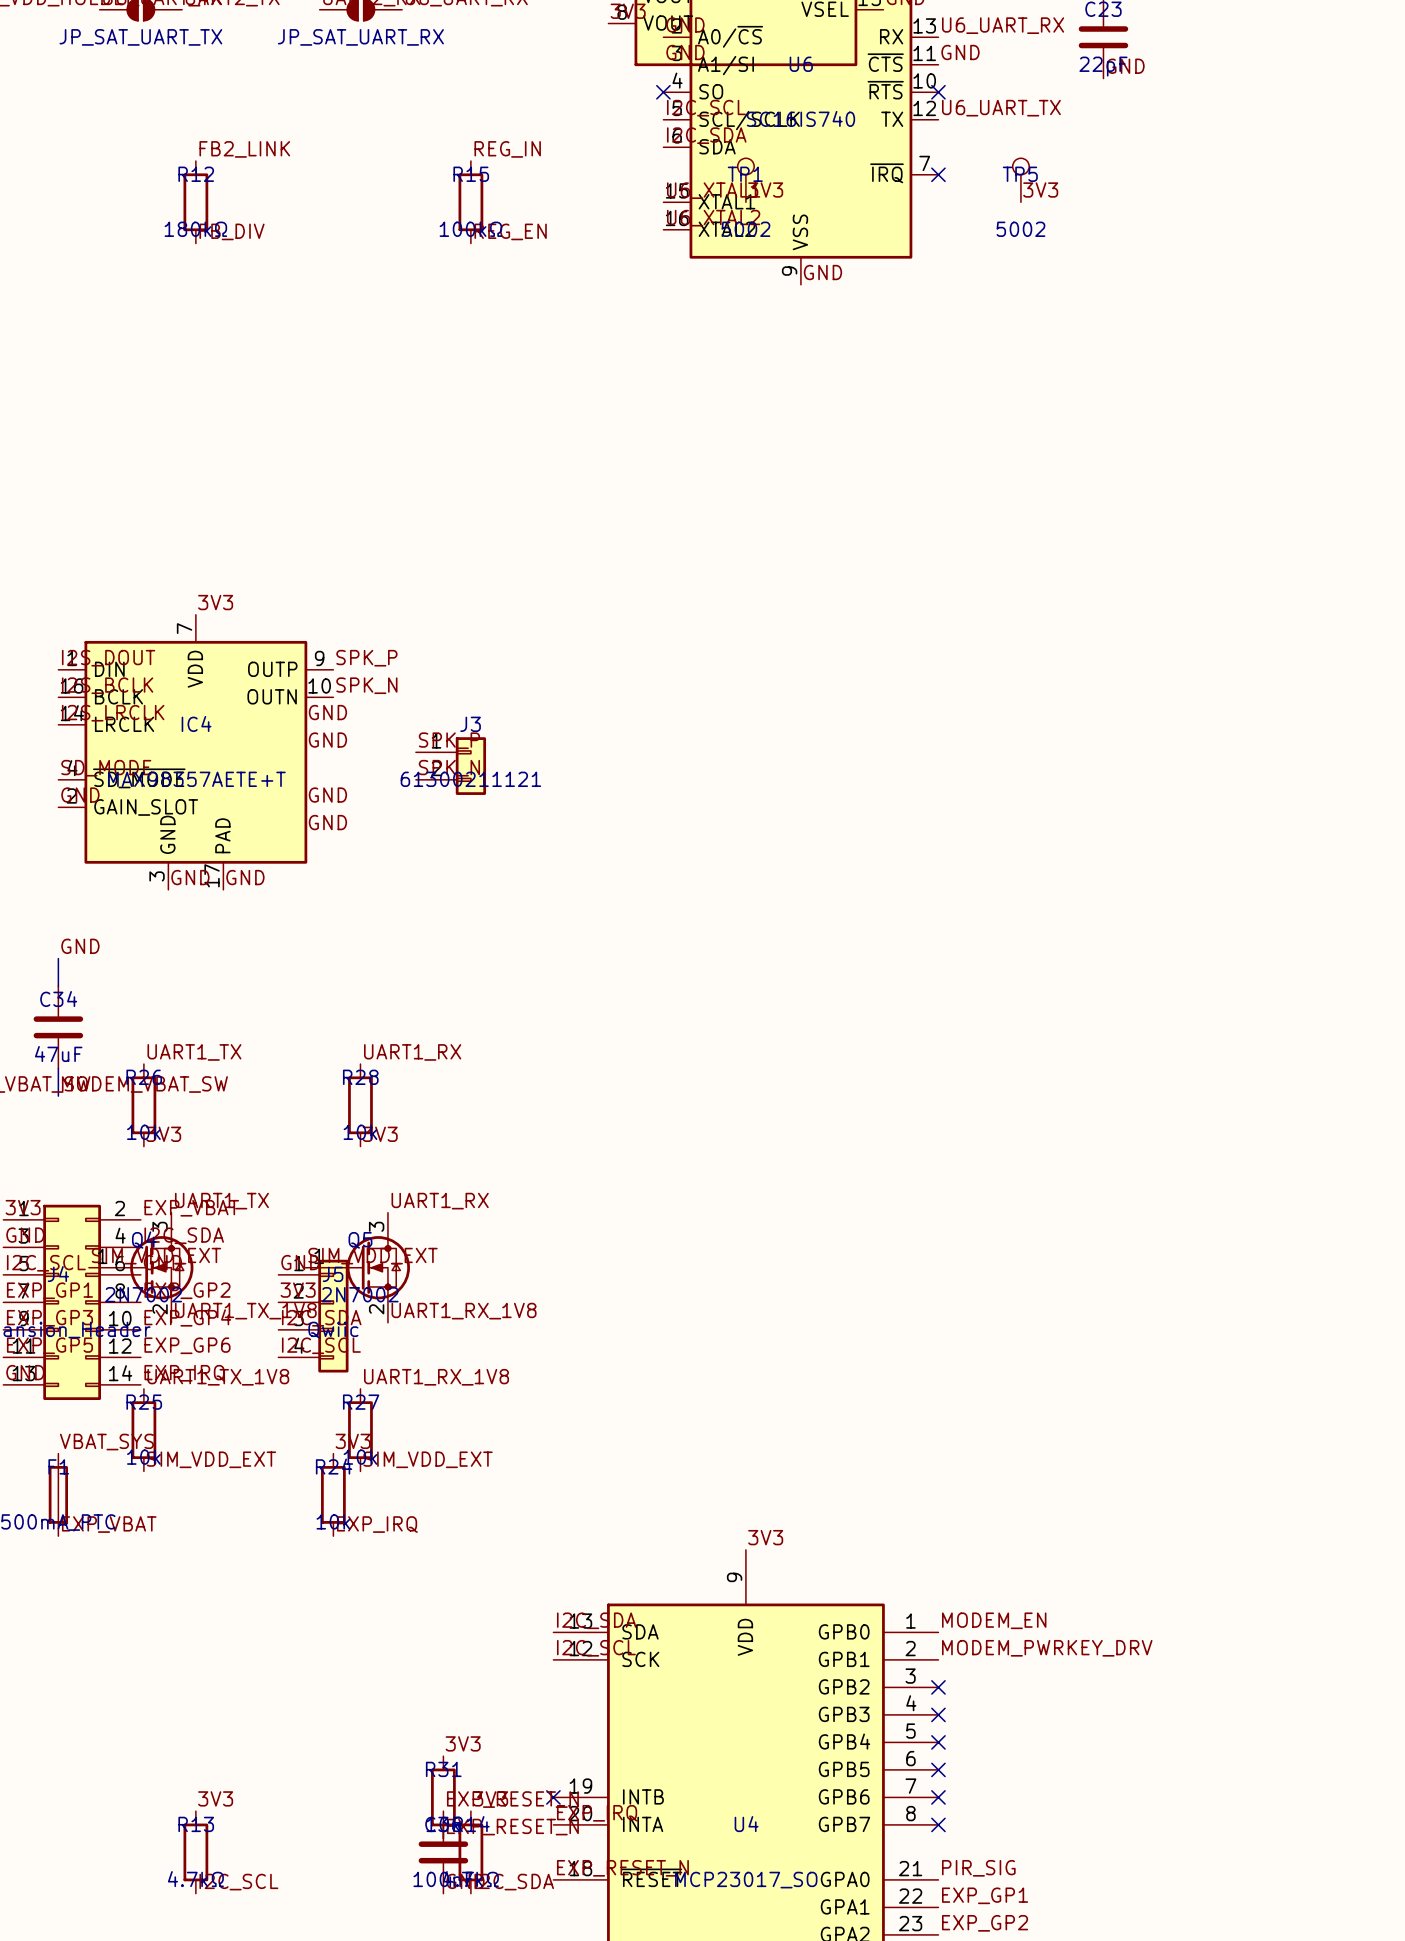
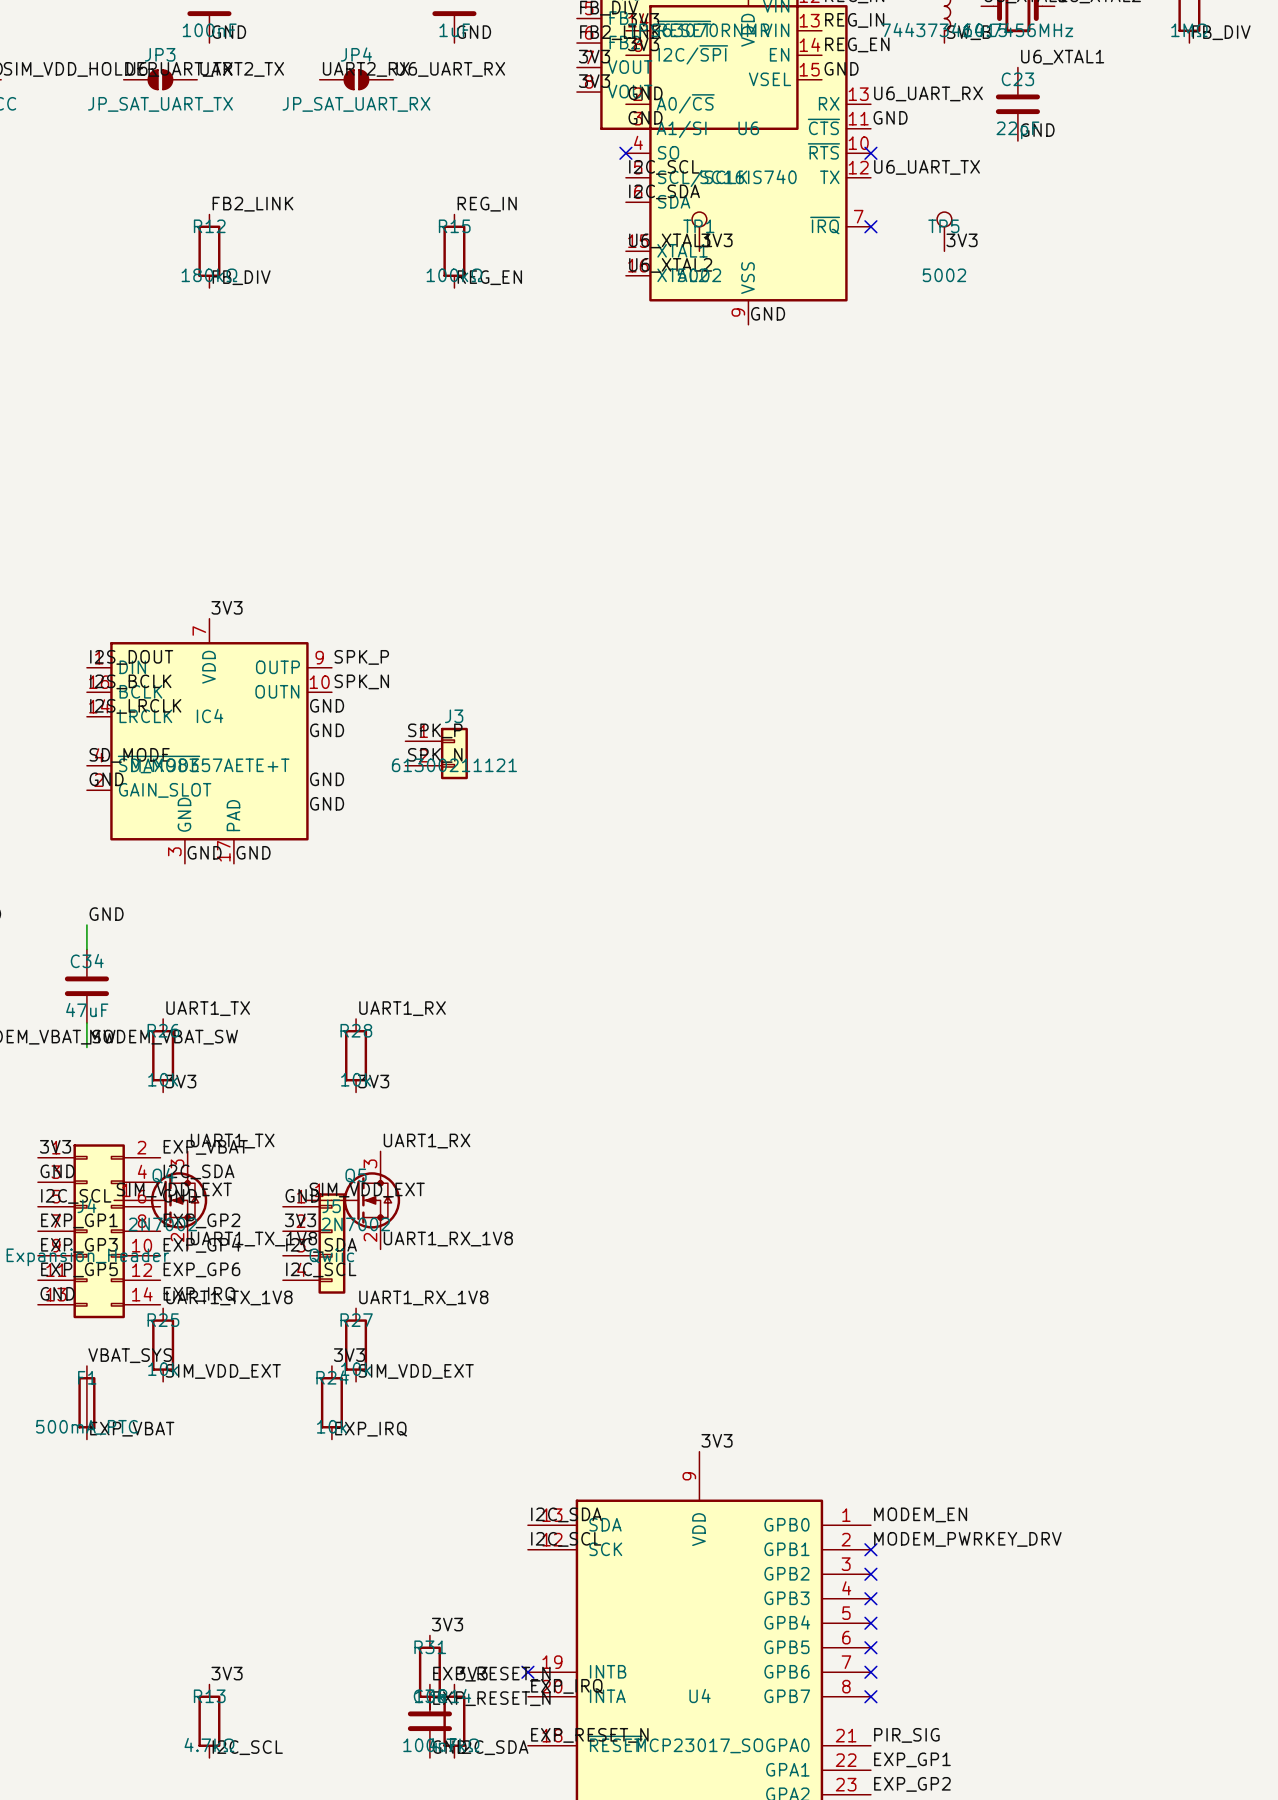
no-connect mark: none -> (870, 1549)

